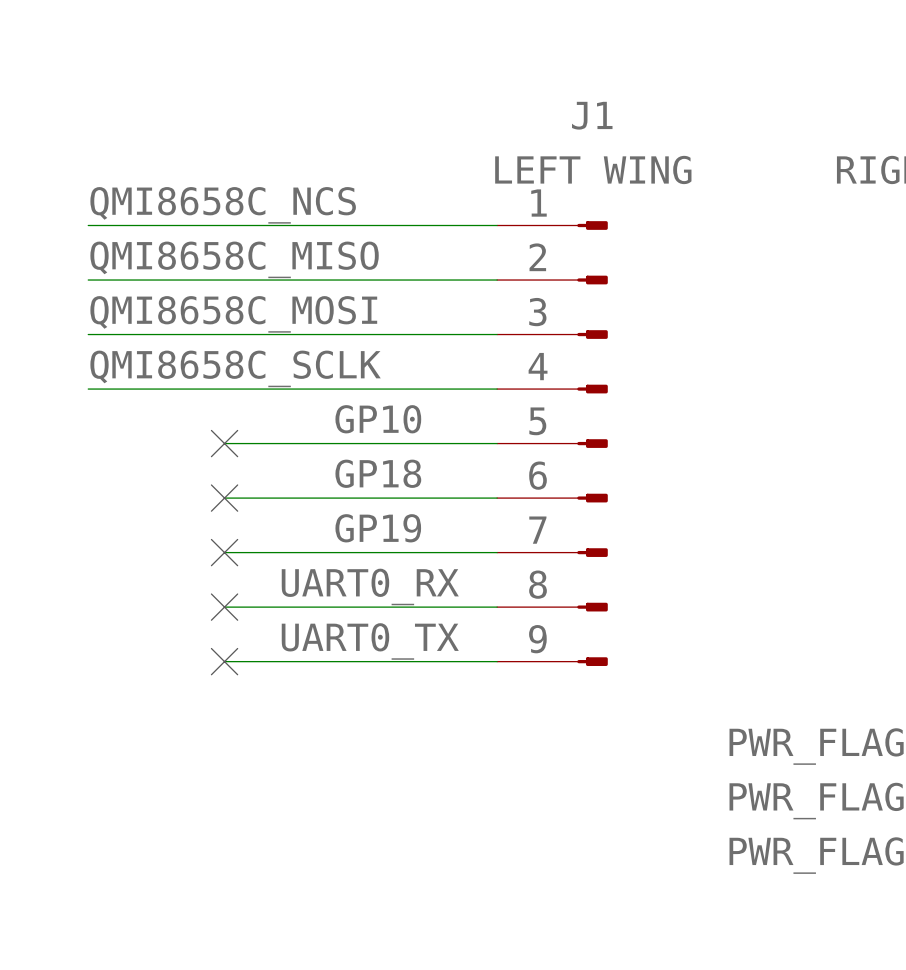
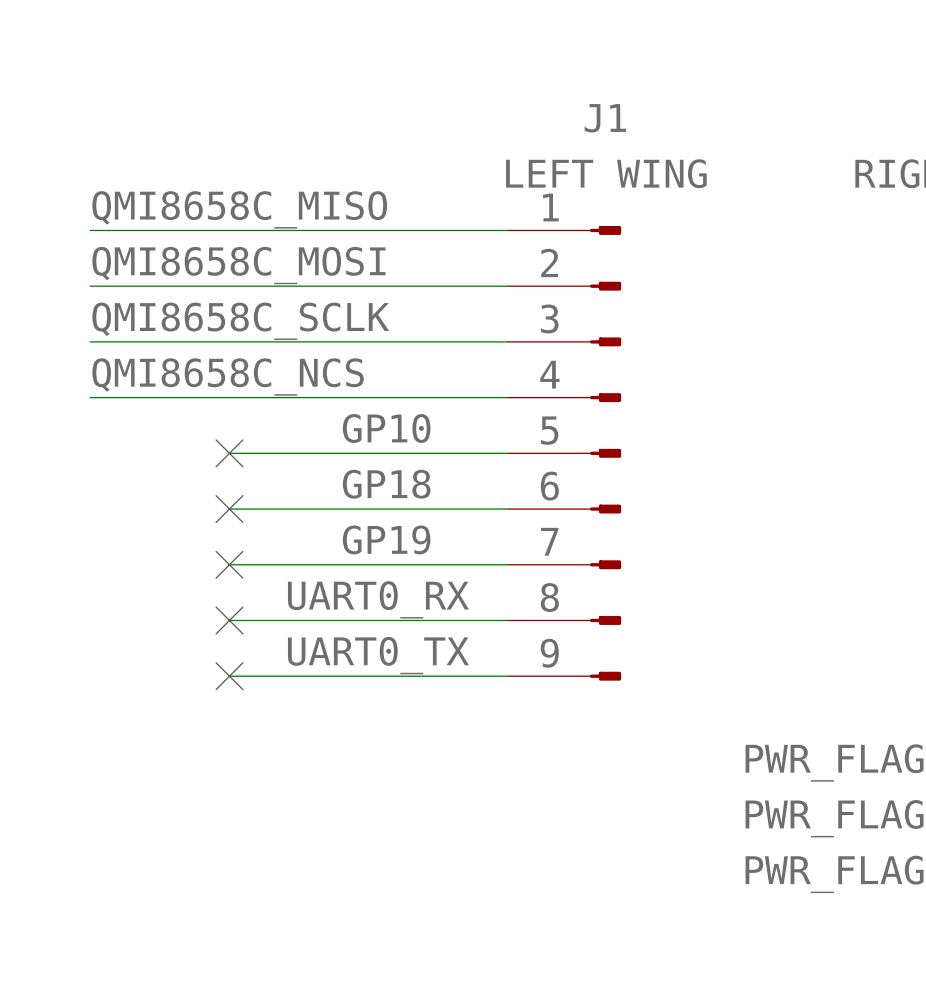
label: QMI8658C_NCS (223, 205) -> QMI8658C_MISO (239, 209)
label: QMI8658C_MISO (234, 259) -> QMI8658C_MOSI (238, 265)
label: QMI8658C_MOSI (233, 314) -> QMI8658C_SCLK (240, 321)
label: QMI8658C_SCLK (235, 368) -> QMI8658C_NCS (228, 377)

